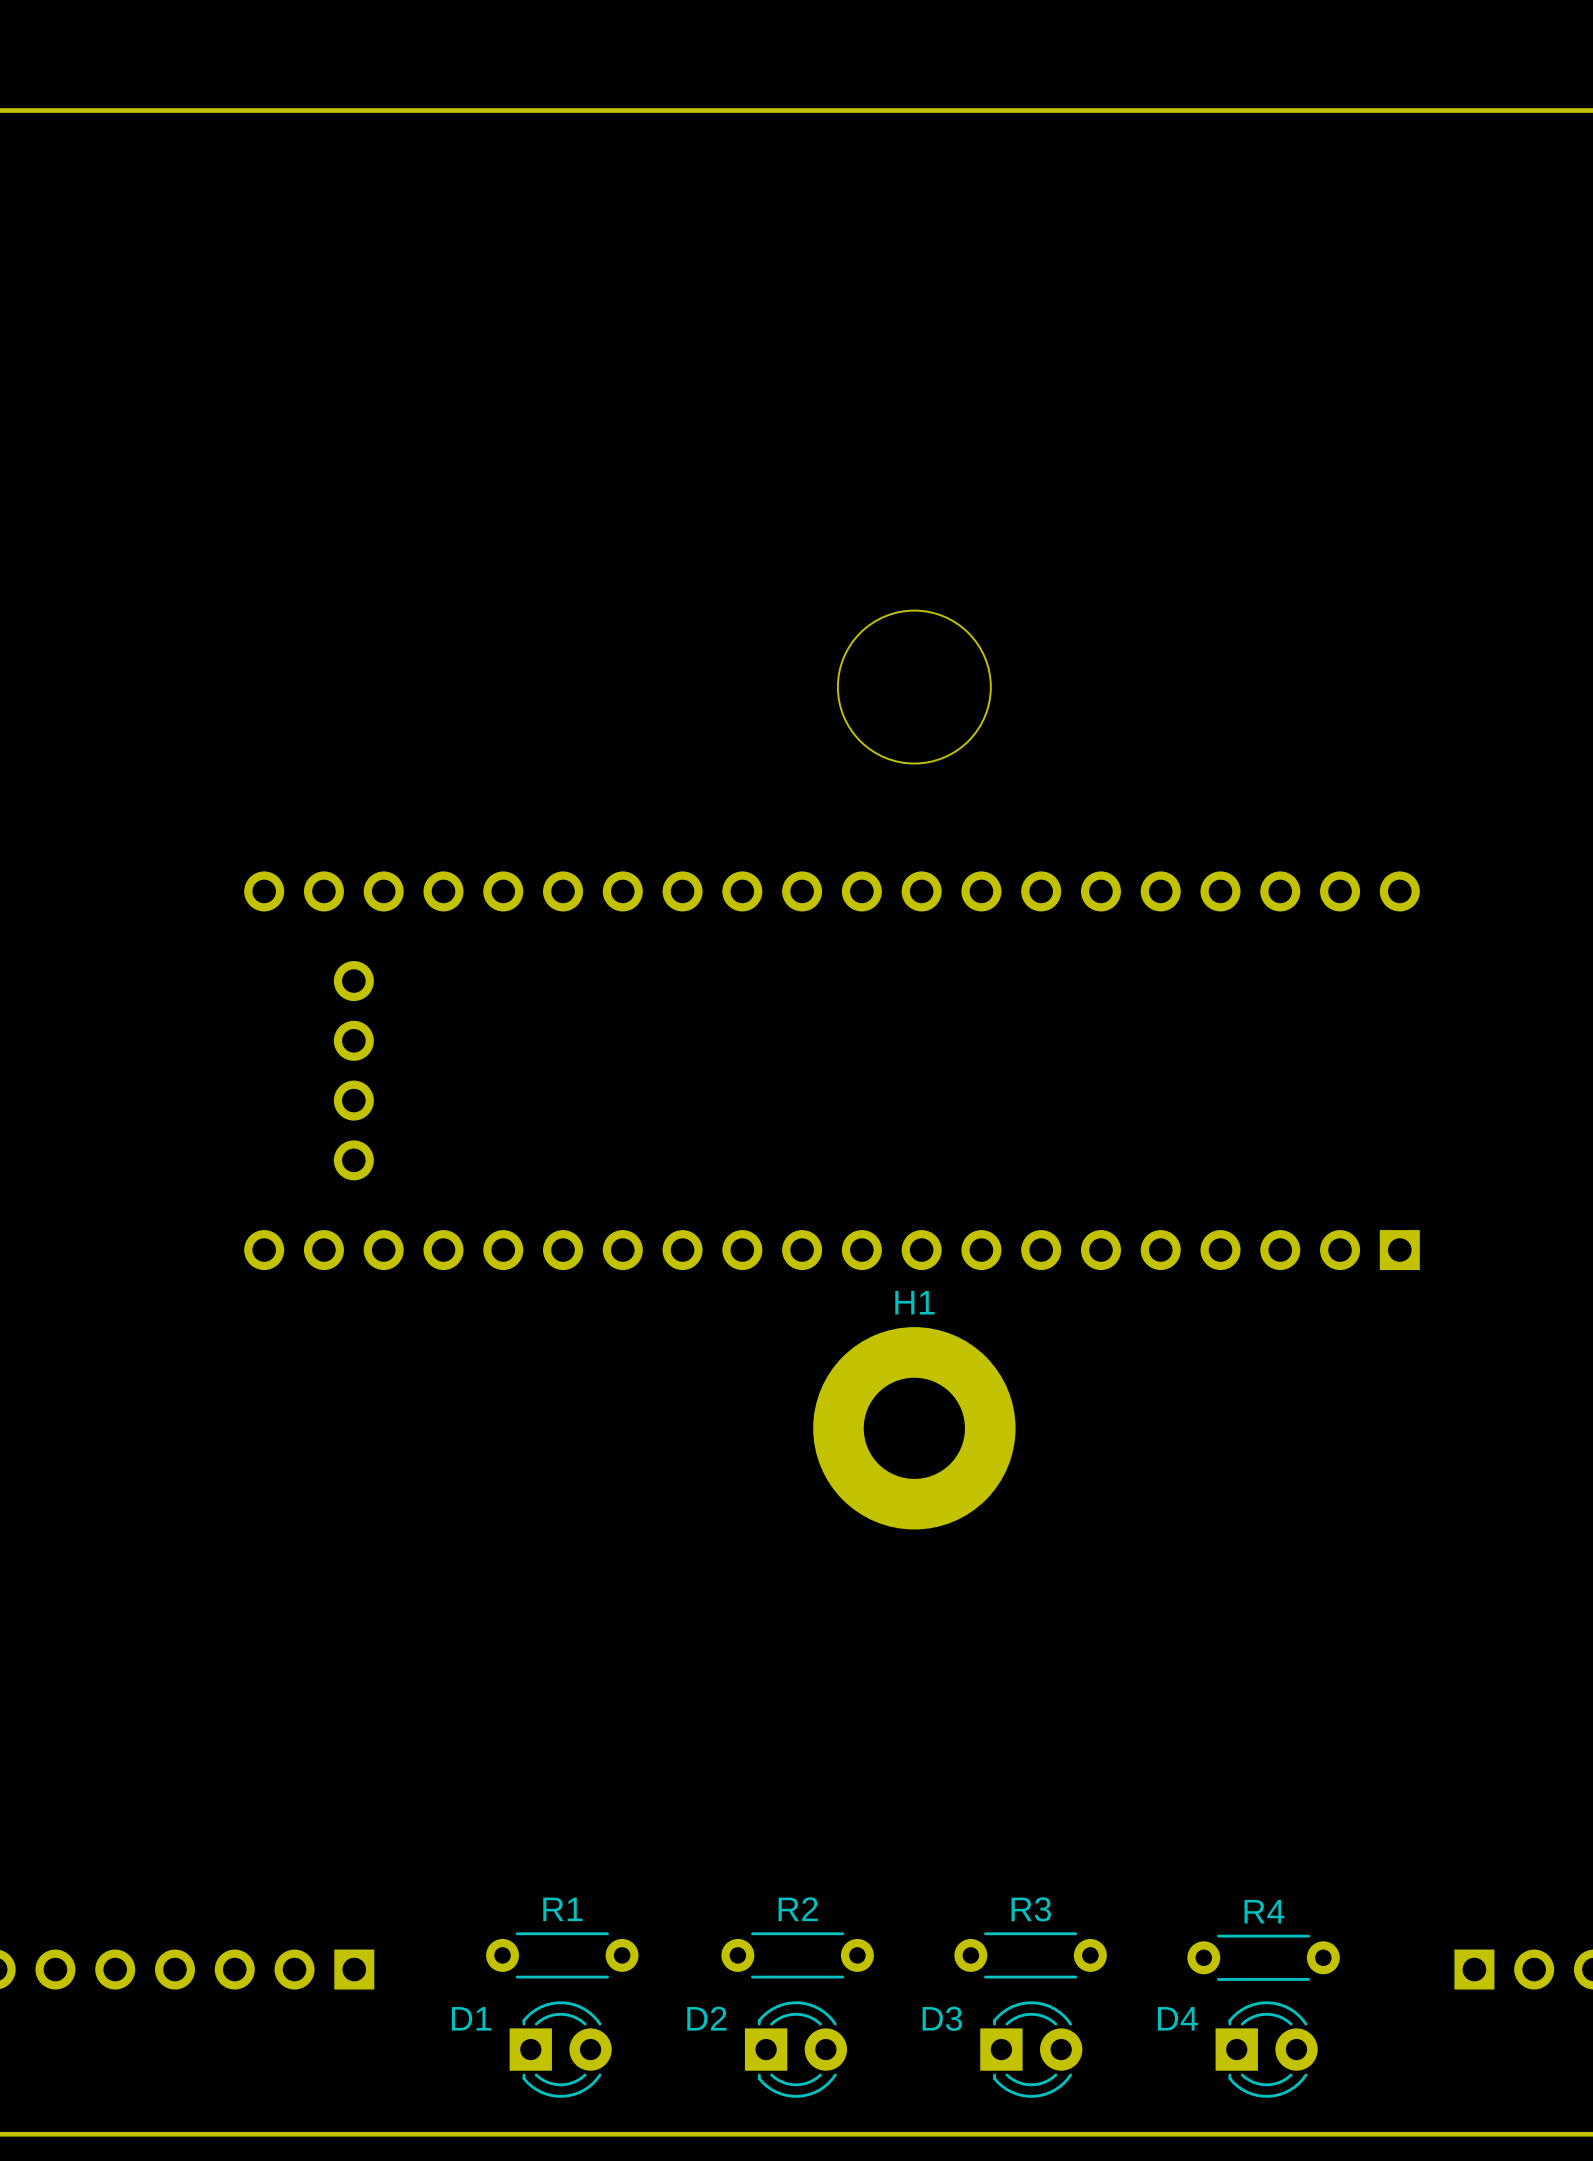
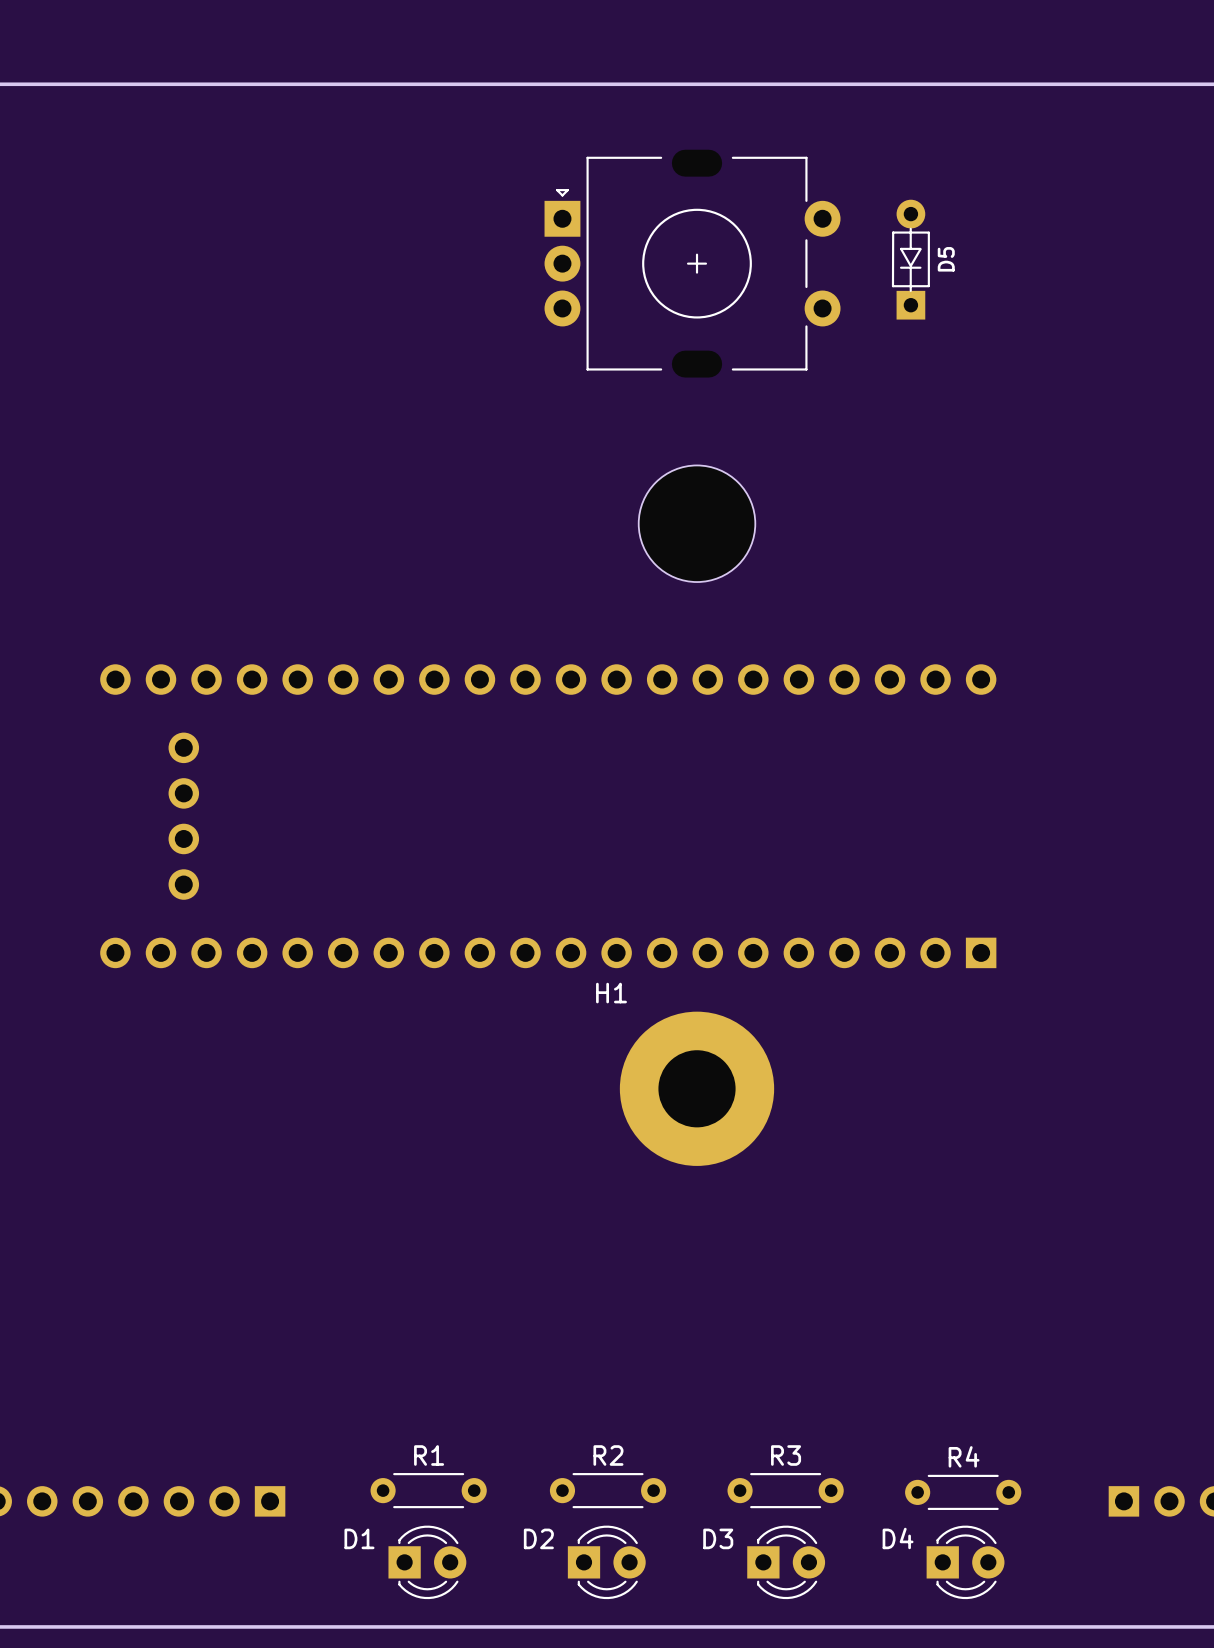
D5: none -> (910, 259)
part: none -> (692, 263)
part position: (831, 1070) -> (548, 816)
H1 name position: H1 (914, 1302) -> H1 (611, 993)

